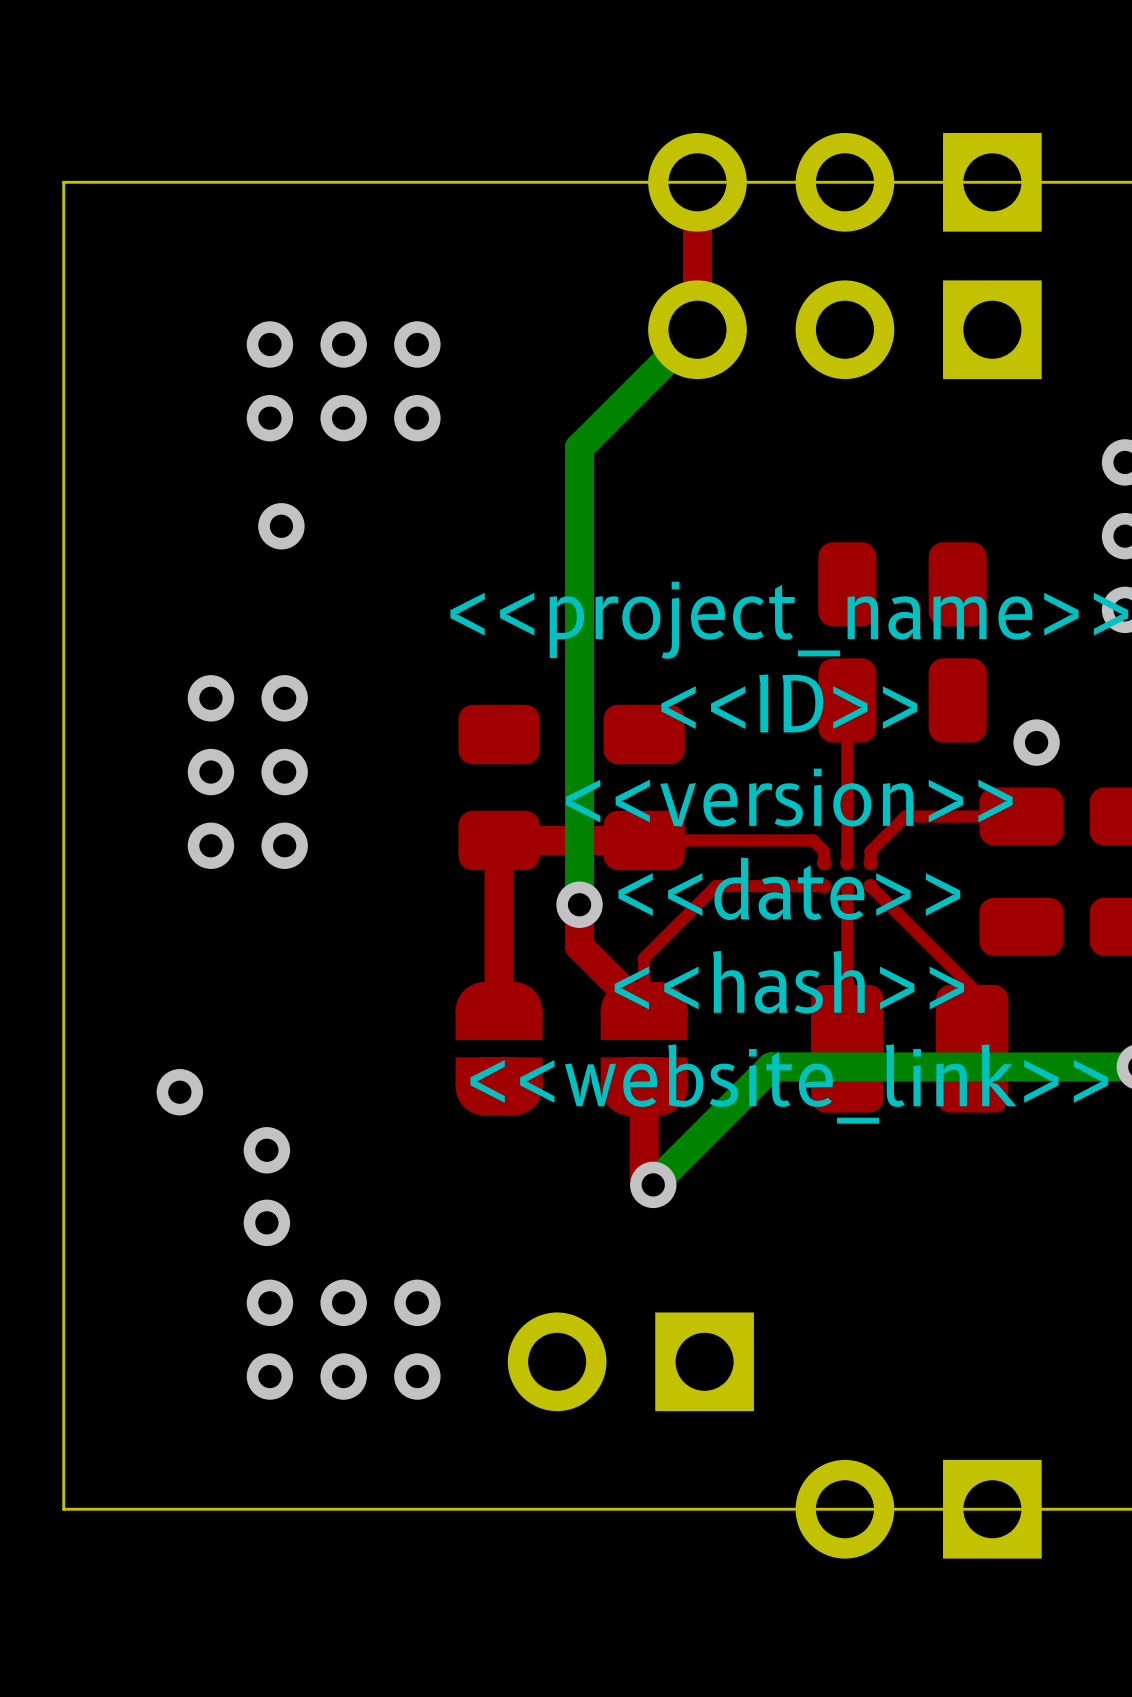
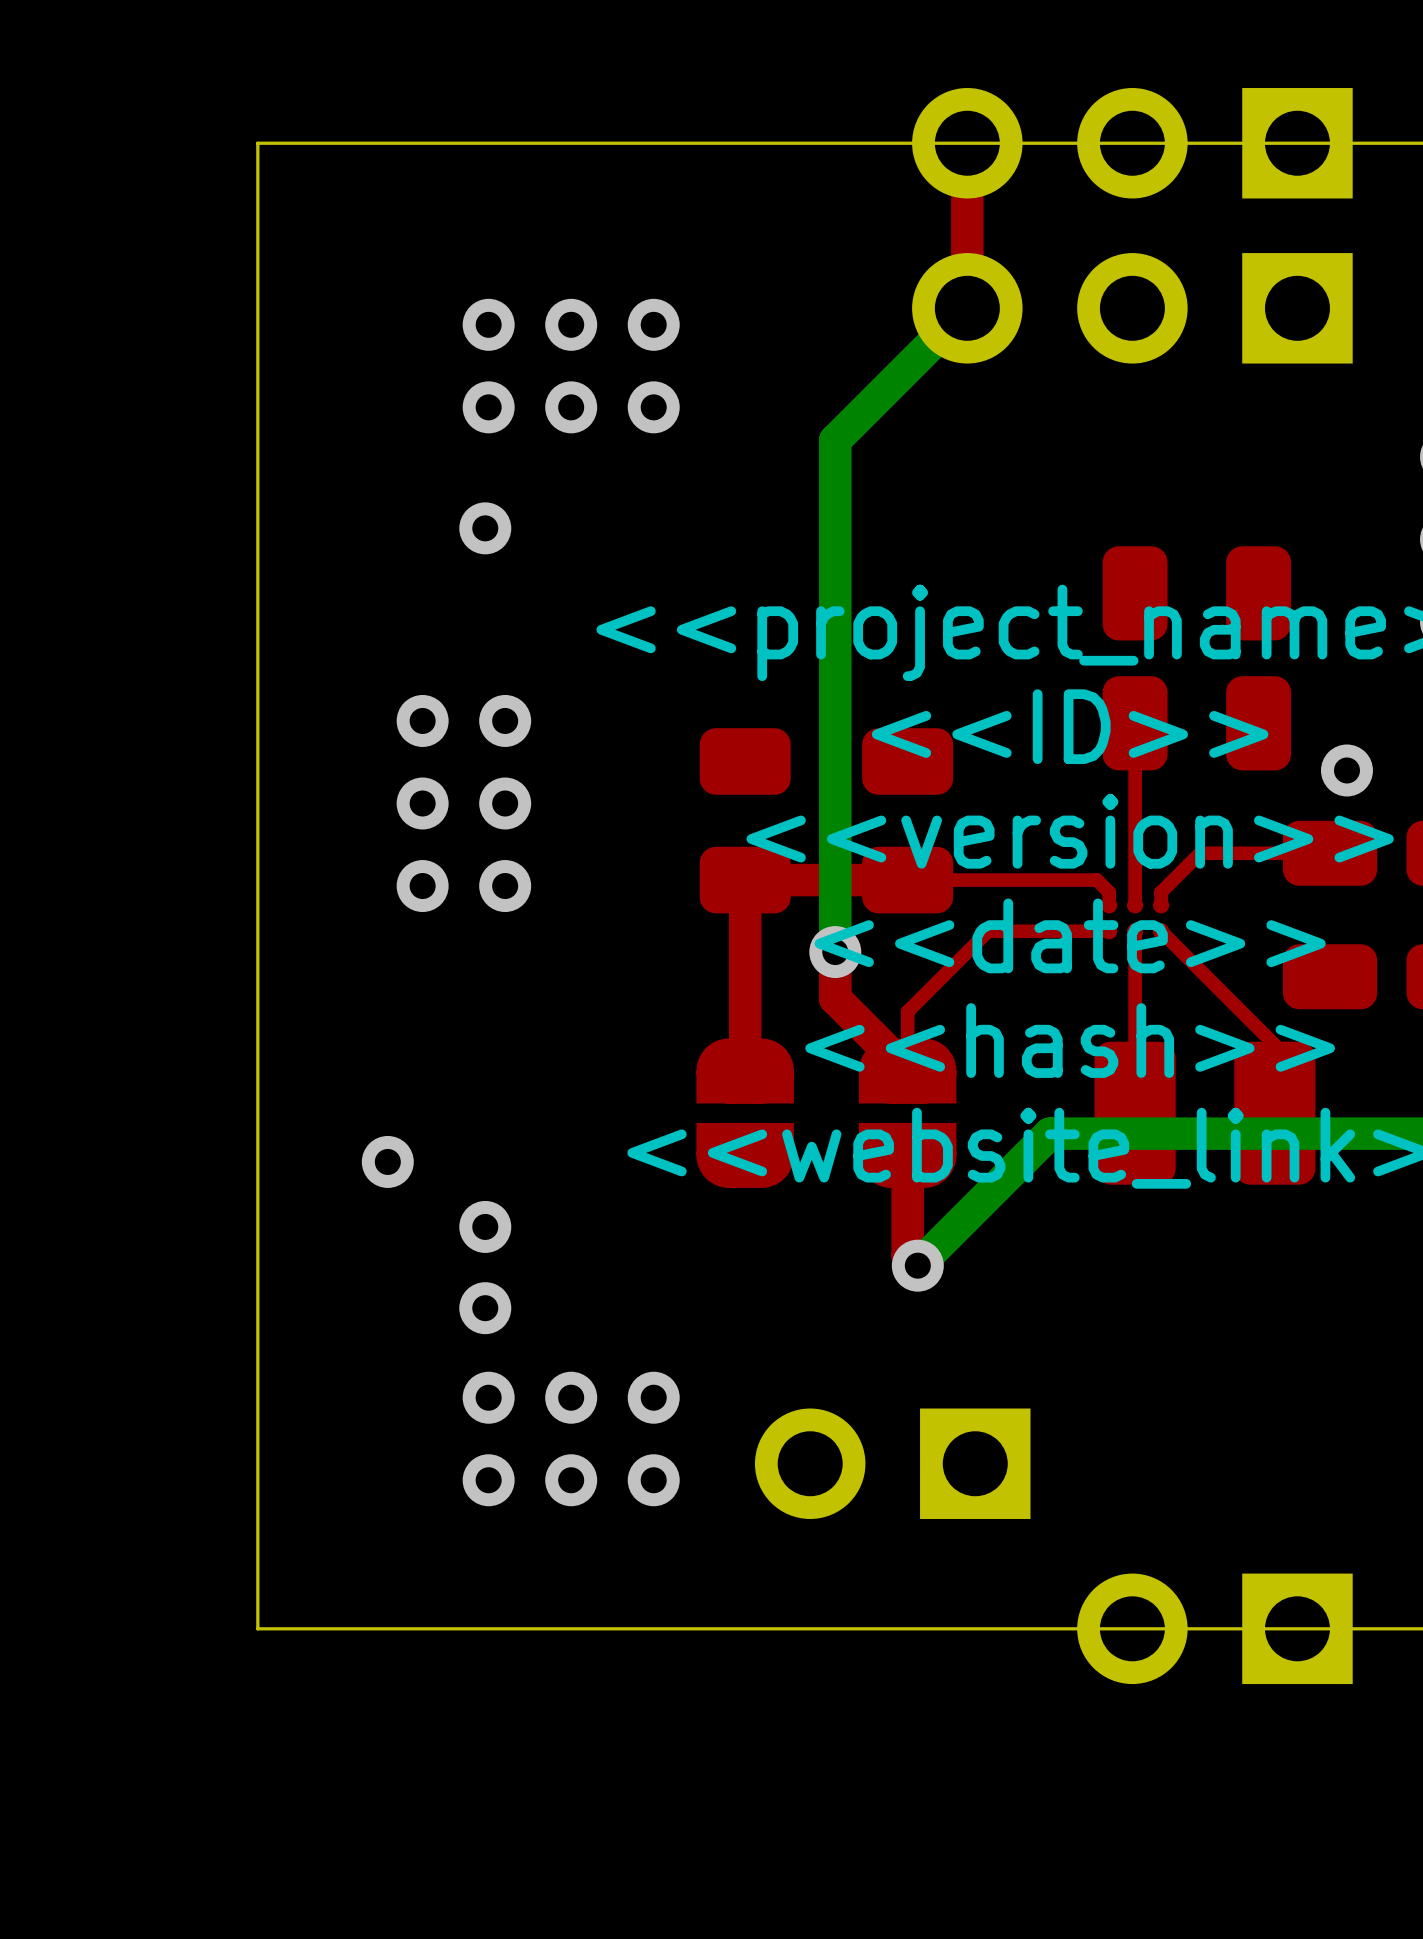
via position: (281, 526) -> (485, 528)

